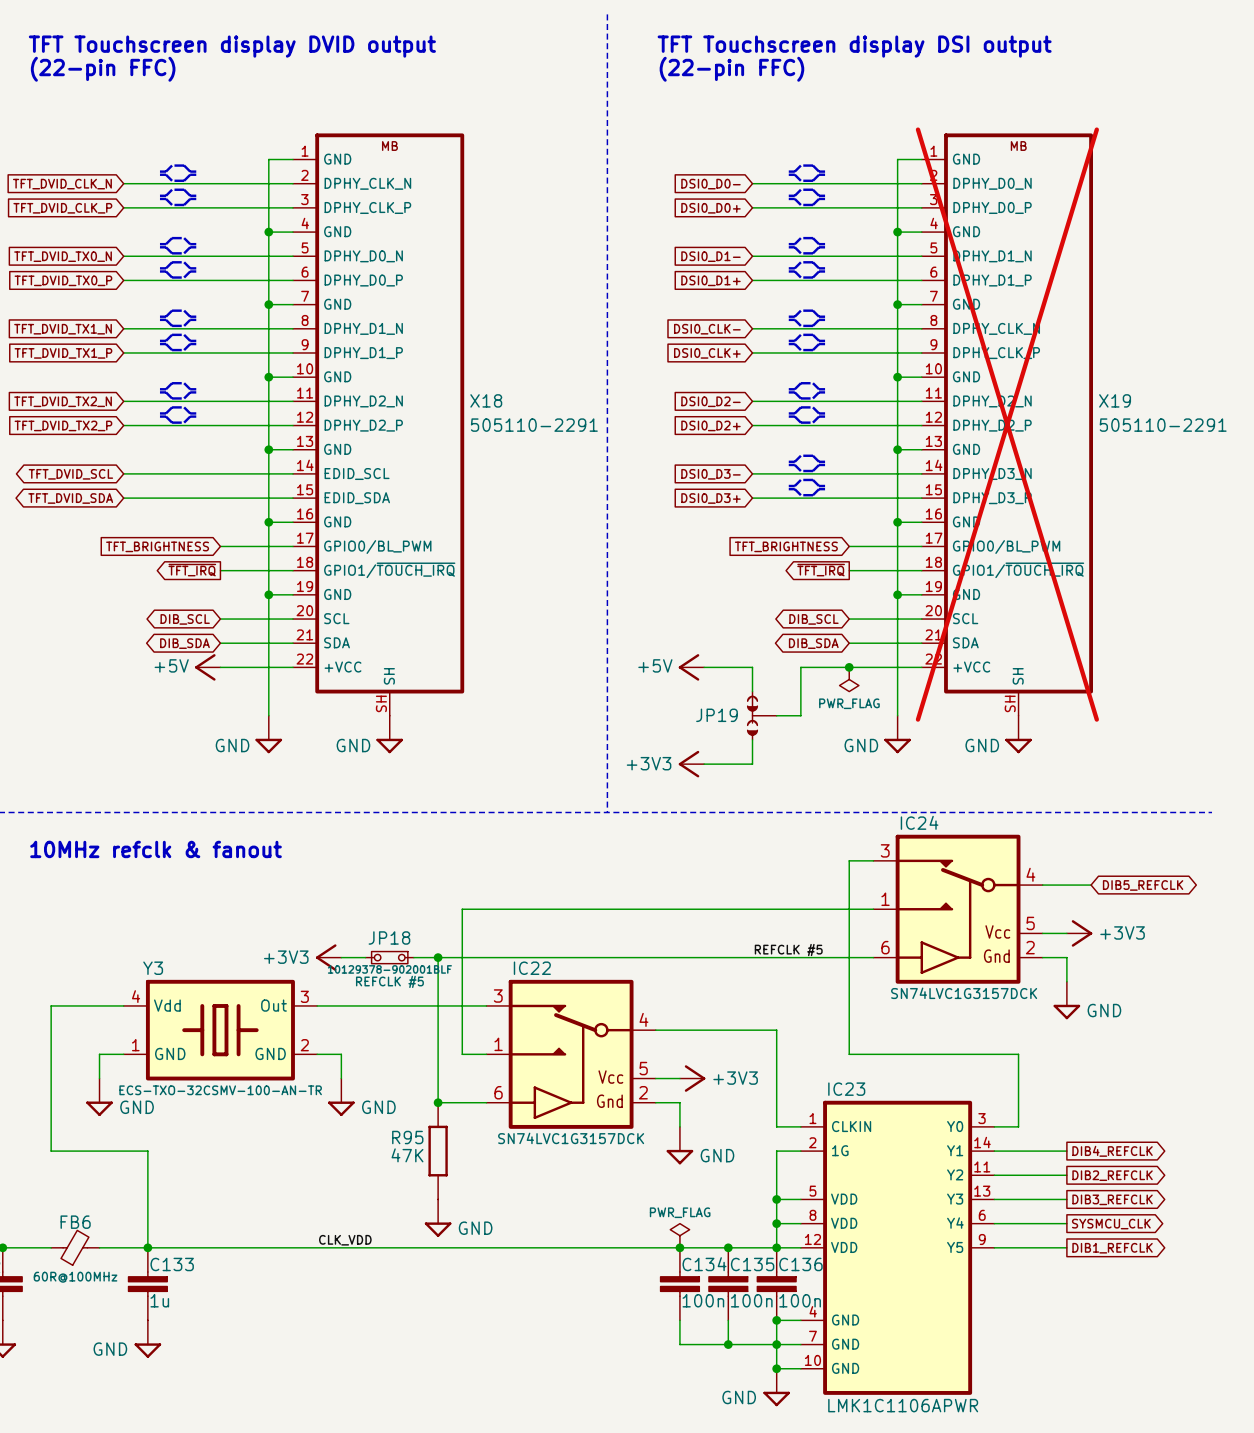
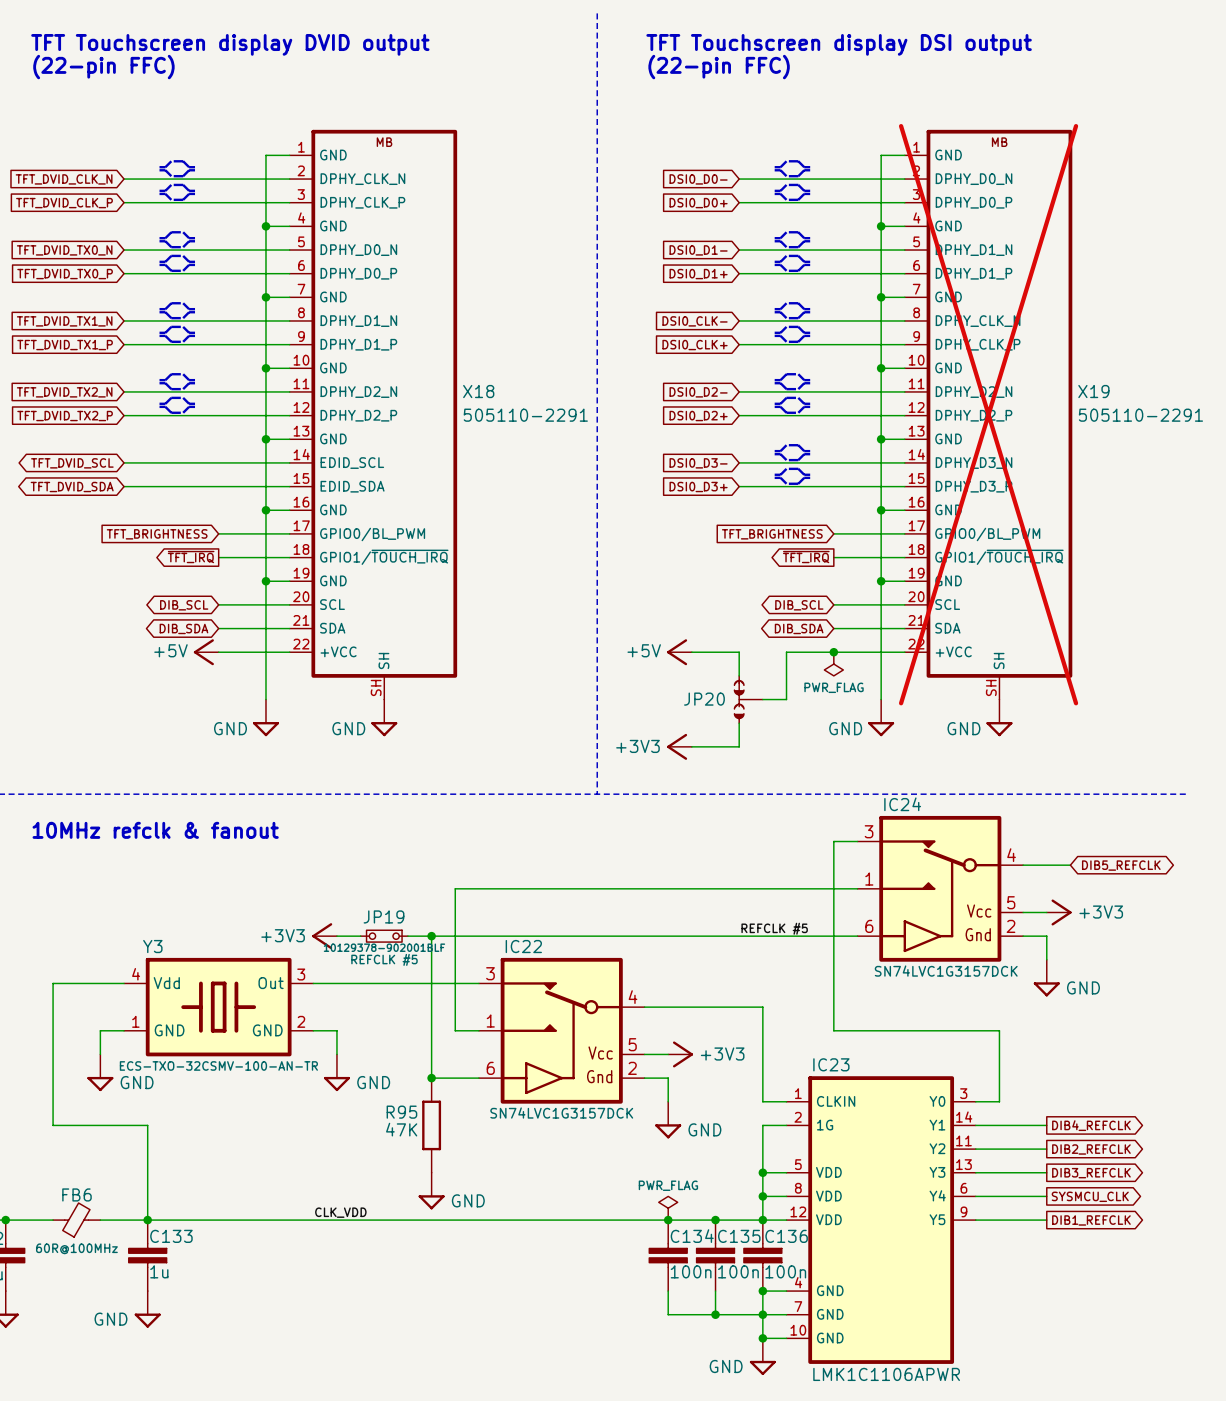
JP19 name: JP19 (717, 715) -> JP20 (704, 699)
JP18 name: JP18 (389, 937) -> JP19 (384, 916)

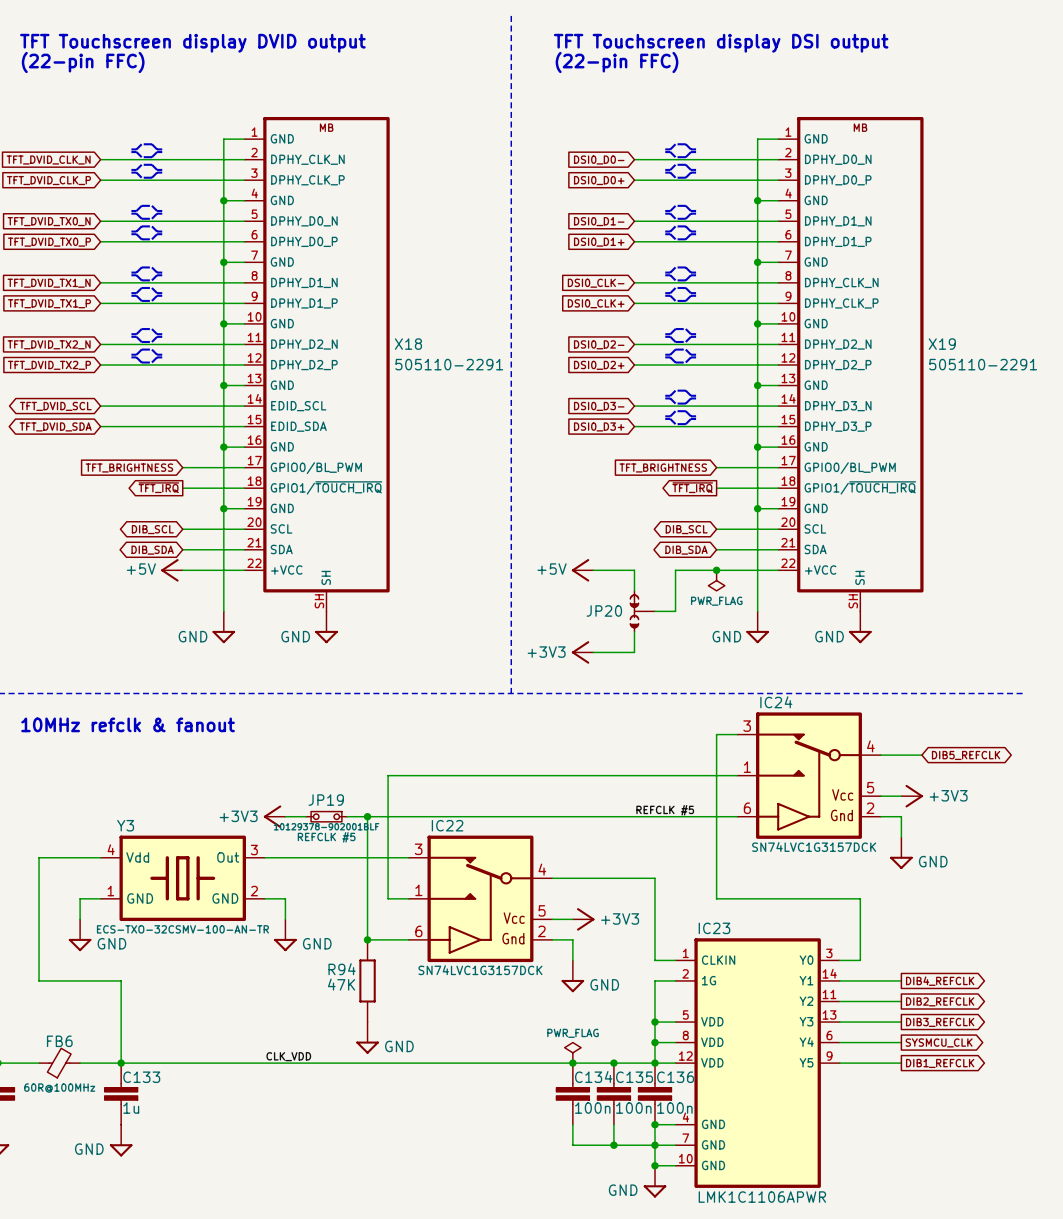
X19 do-not-place cross: (988, 414) -> none
R95 name: R95 (401, 1112) -> R94 (342, 969)

